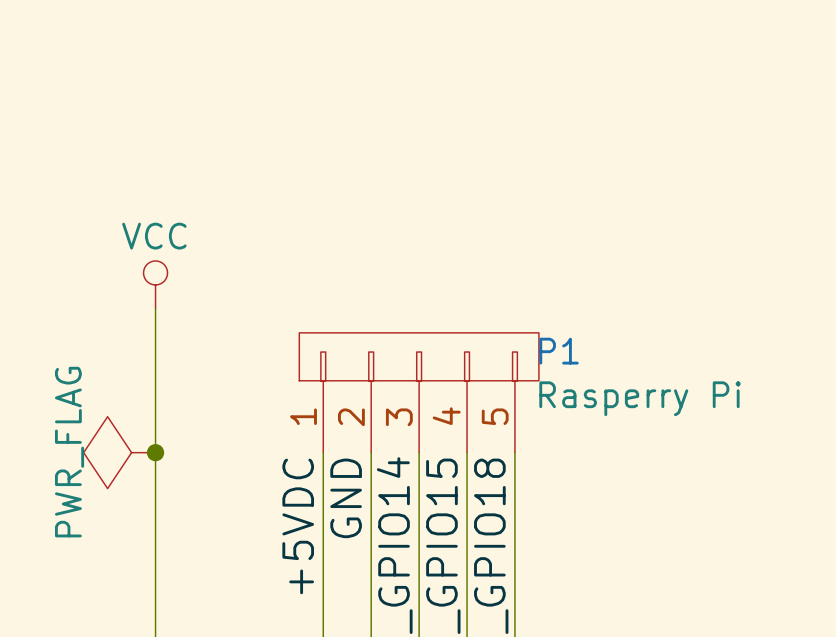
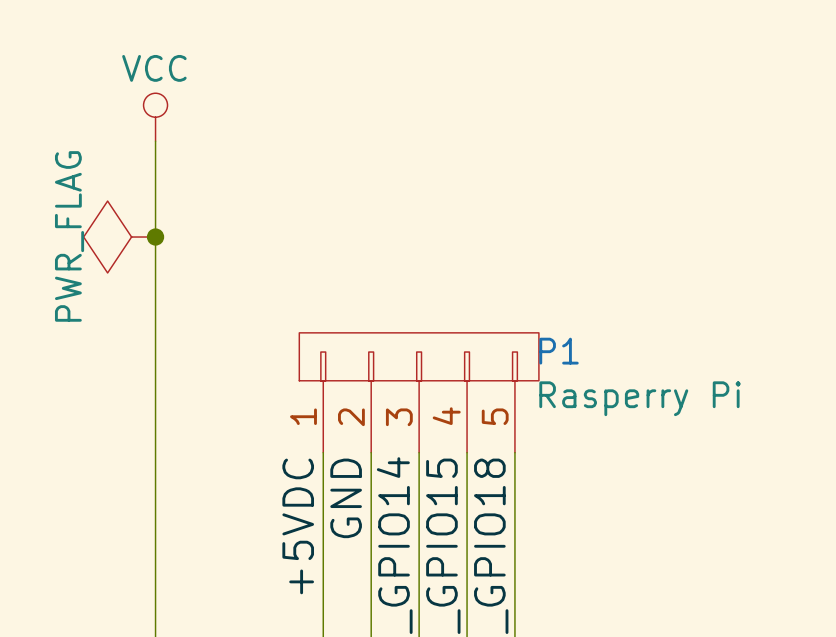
wire: none -> (155, 141) (155, 308)
junction: none -> (155, 237)
power symbol position: VCC (155, 284) -> VCC (155, 117)
power symbol position: PWR_FLAG (119, 452) -> PWR_FLAG (119, 237)
junction: (155, 452) -> none

